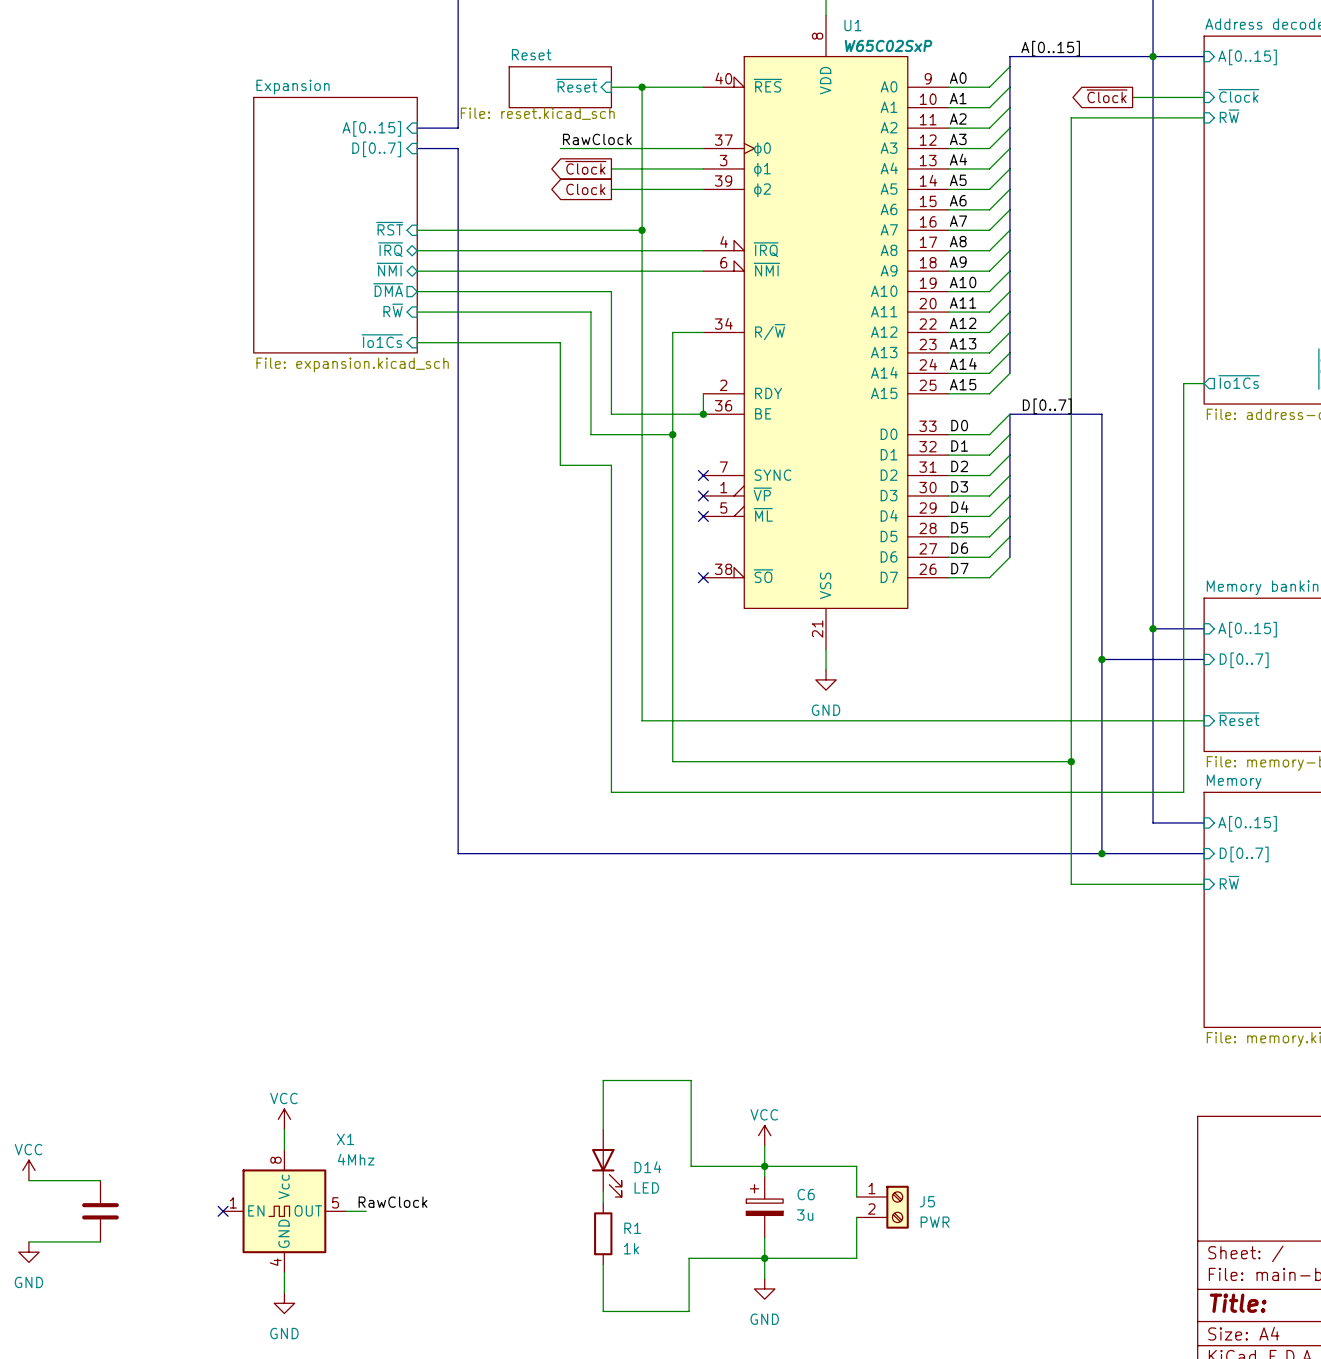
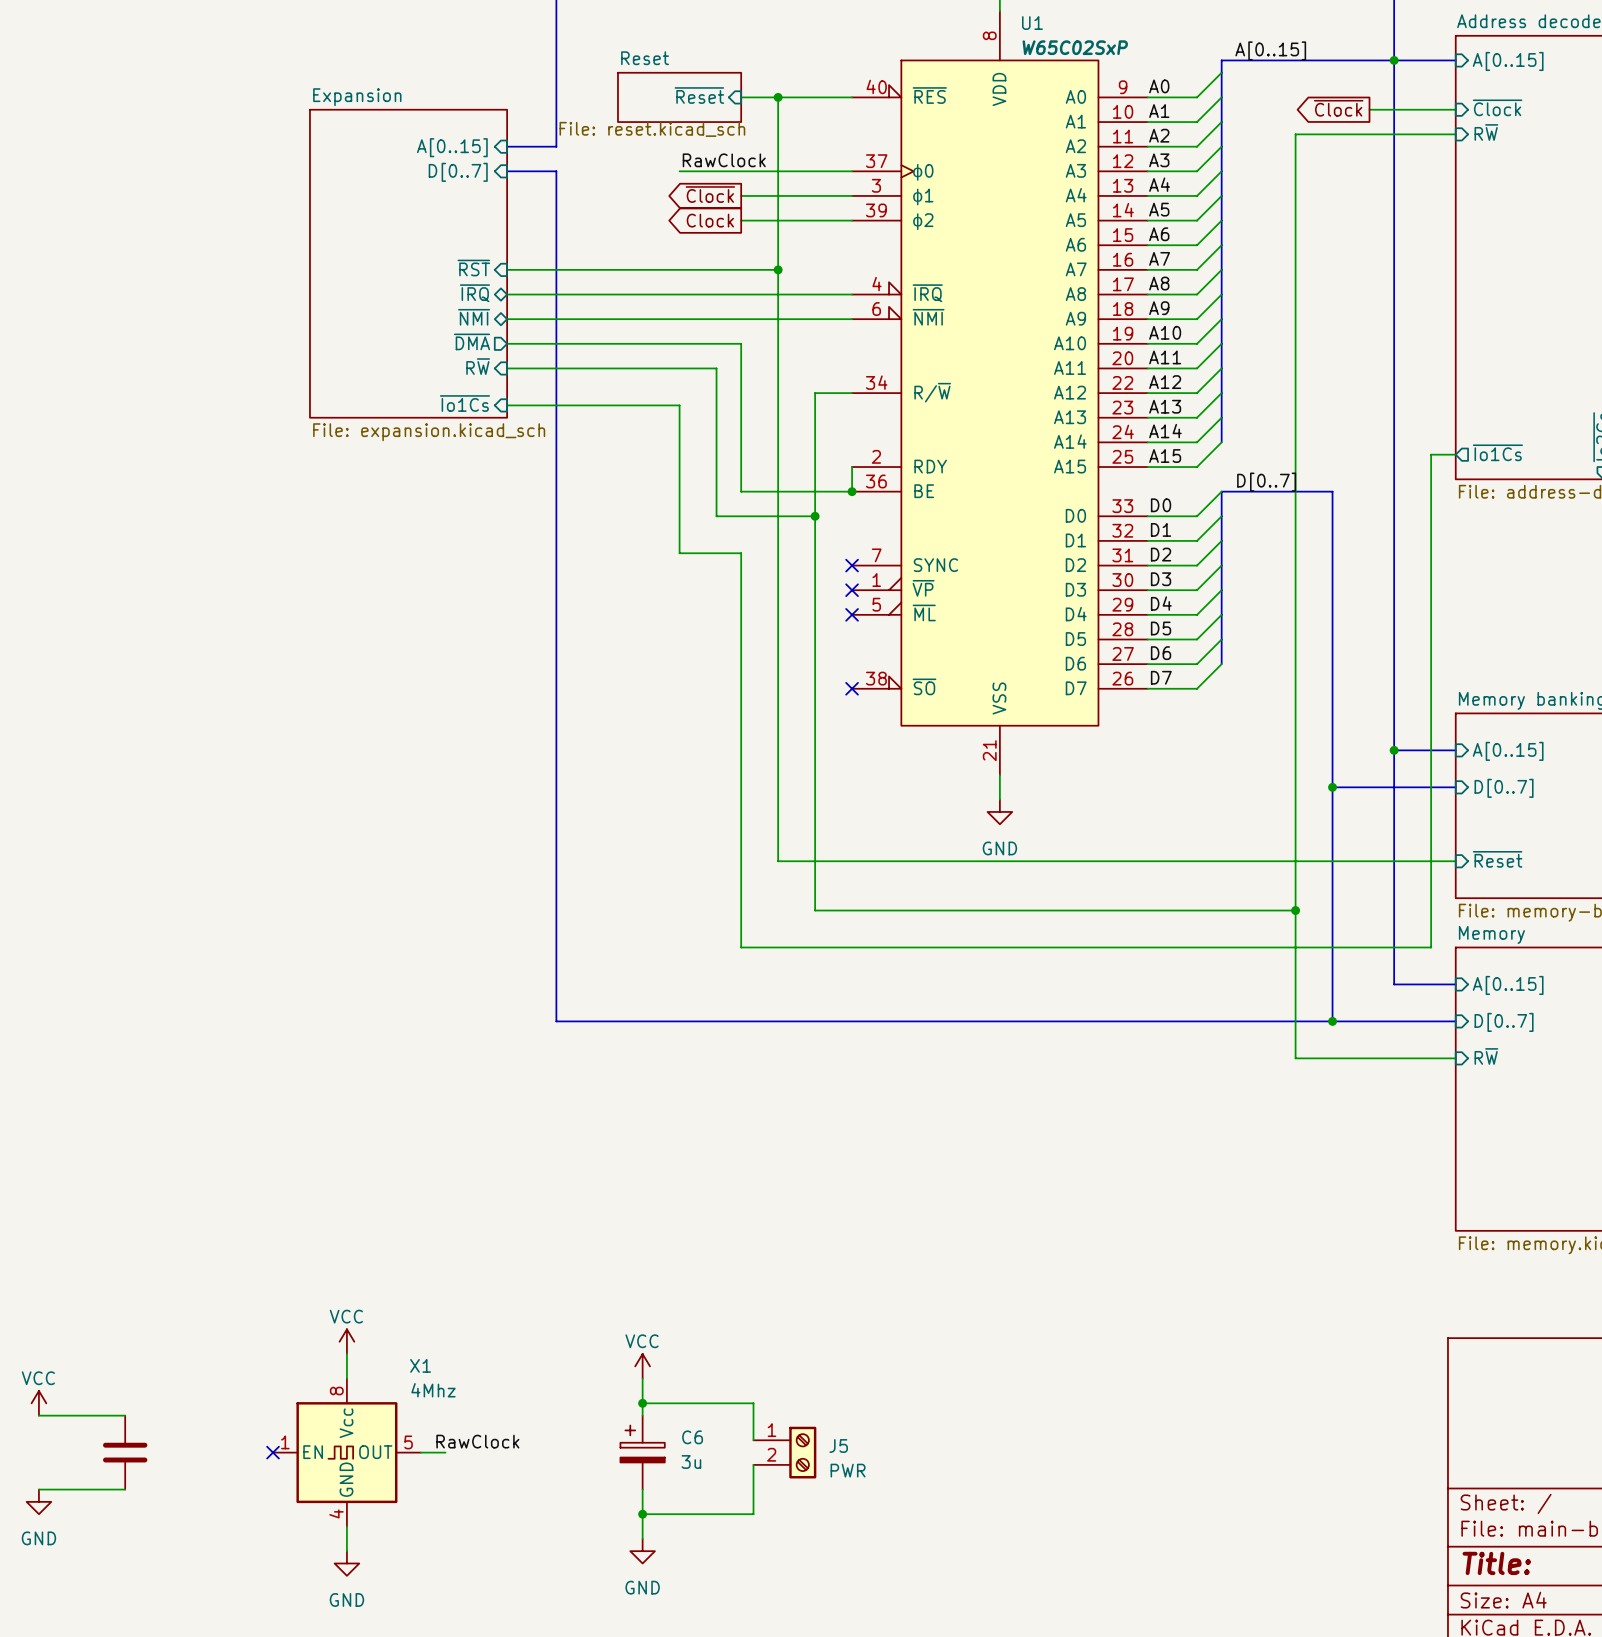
wire: (603, 1129) (603, 1080) (691, 1080) (691, 1166) (856, 1166) (856, 1197) -> none
power symbol: VCC (764, 1135) -> none
power symbol: none -> VCC (642, 1366)
wire: (764, 1145) (764, 1176) -> none
wire: none -> (642, 1378) (642, 1415)
D14: LED (606, 1163) -> none
junction: (764, 1166) -> none
wire: none -> (642, 1403) (753, 1403) (753, 1440)
junction: none -> (642, 1403)
wire: (603, 1190) (603, 1203) -> none
C6 position: (764, 1207) -> (642, 1452)
J5 position: (882, 1207) -> (784, 1452)
wire: (856, 1217) (856, 1258) (689, 1258) (689, 1311) (603, 1311) (603, 1264) -> none
wire: none -> (753, 1464) (753, 1514) (642, 1514)
R1: 1k (603, 1233) -> none
wire: (764, 1237) (764, 1278) -> none
wire: none -> (642, 1489) (642, 1538)
junction: (764, 1258) -> none
junction: none -> (642, 1514)
power symbol: GND (764, 1288) -> none
power symbol: none -> GND (642, 1551)

